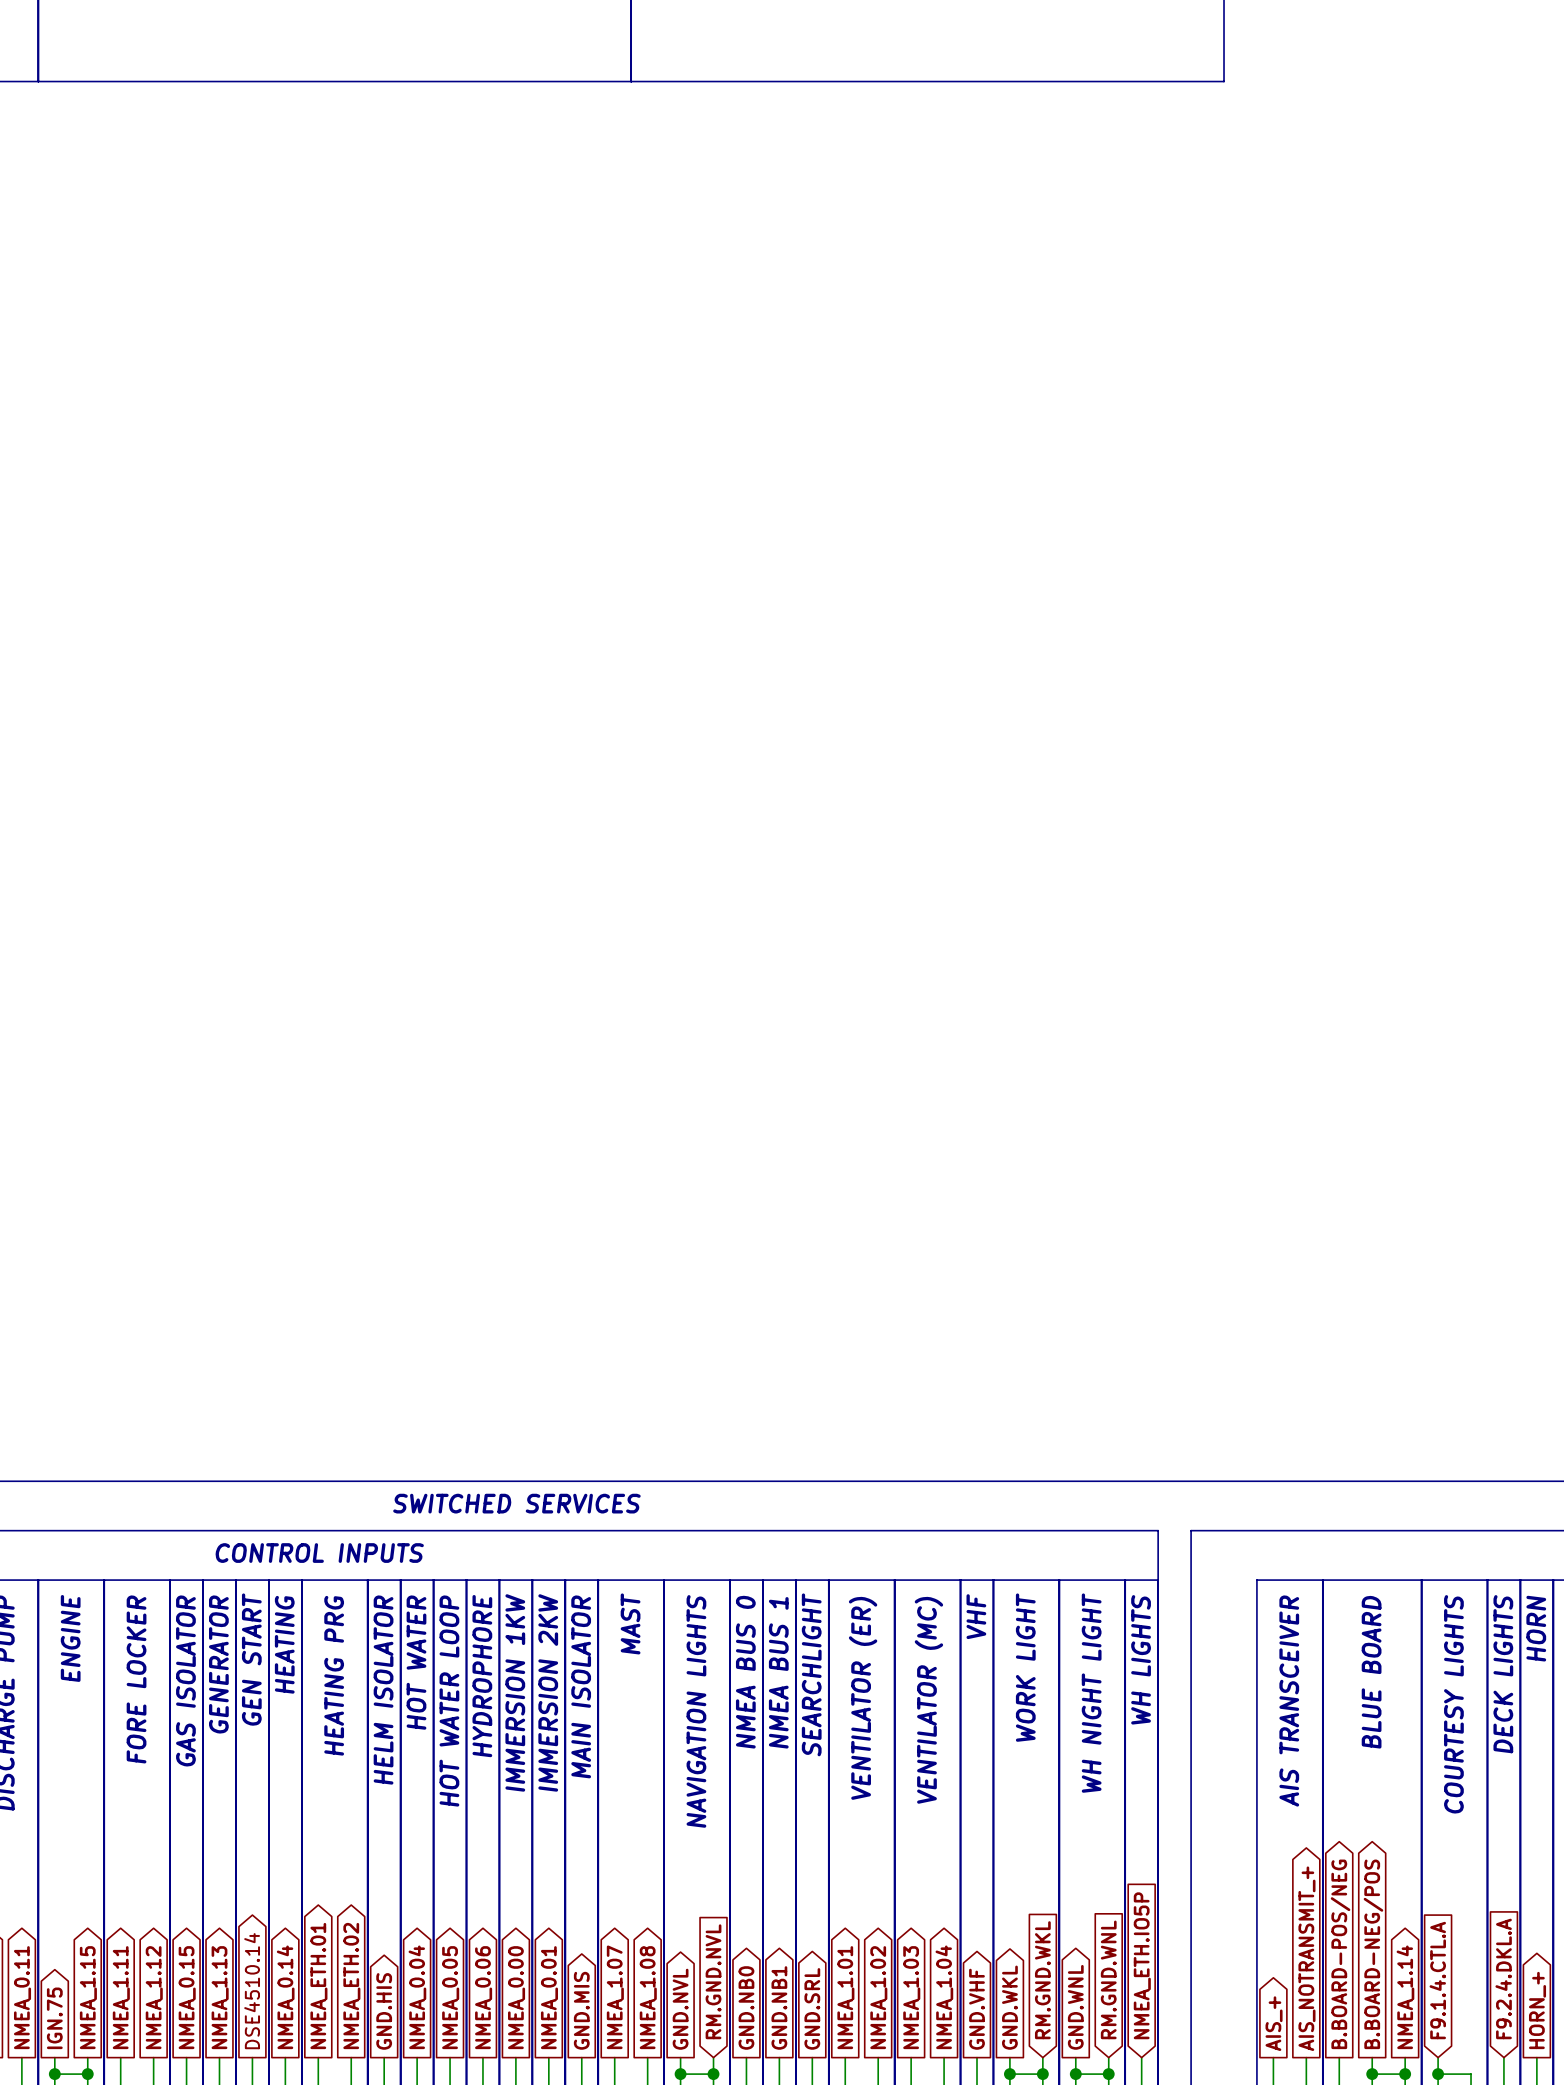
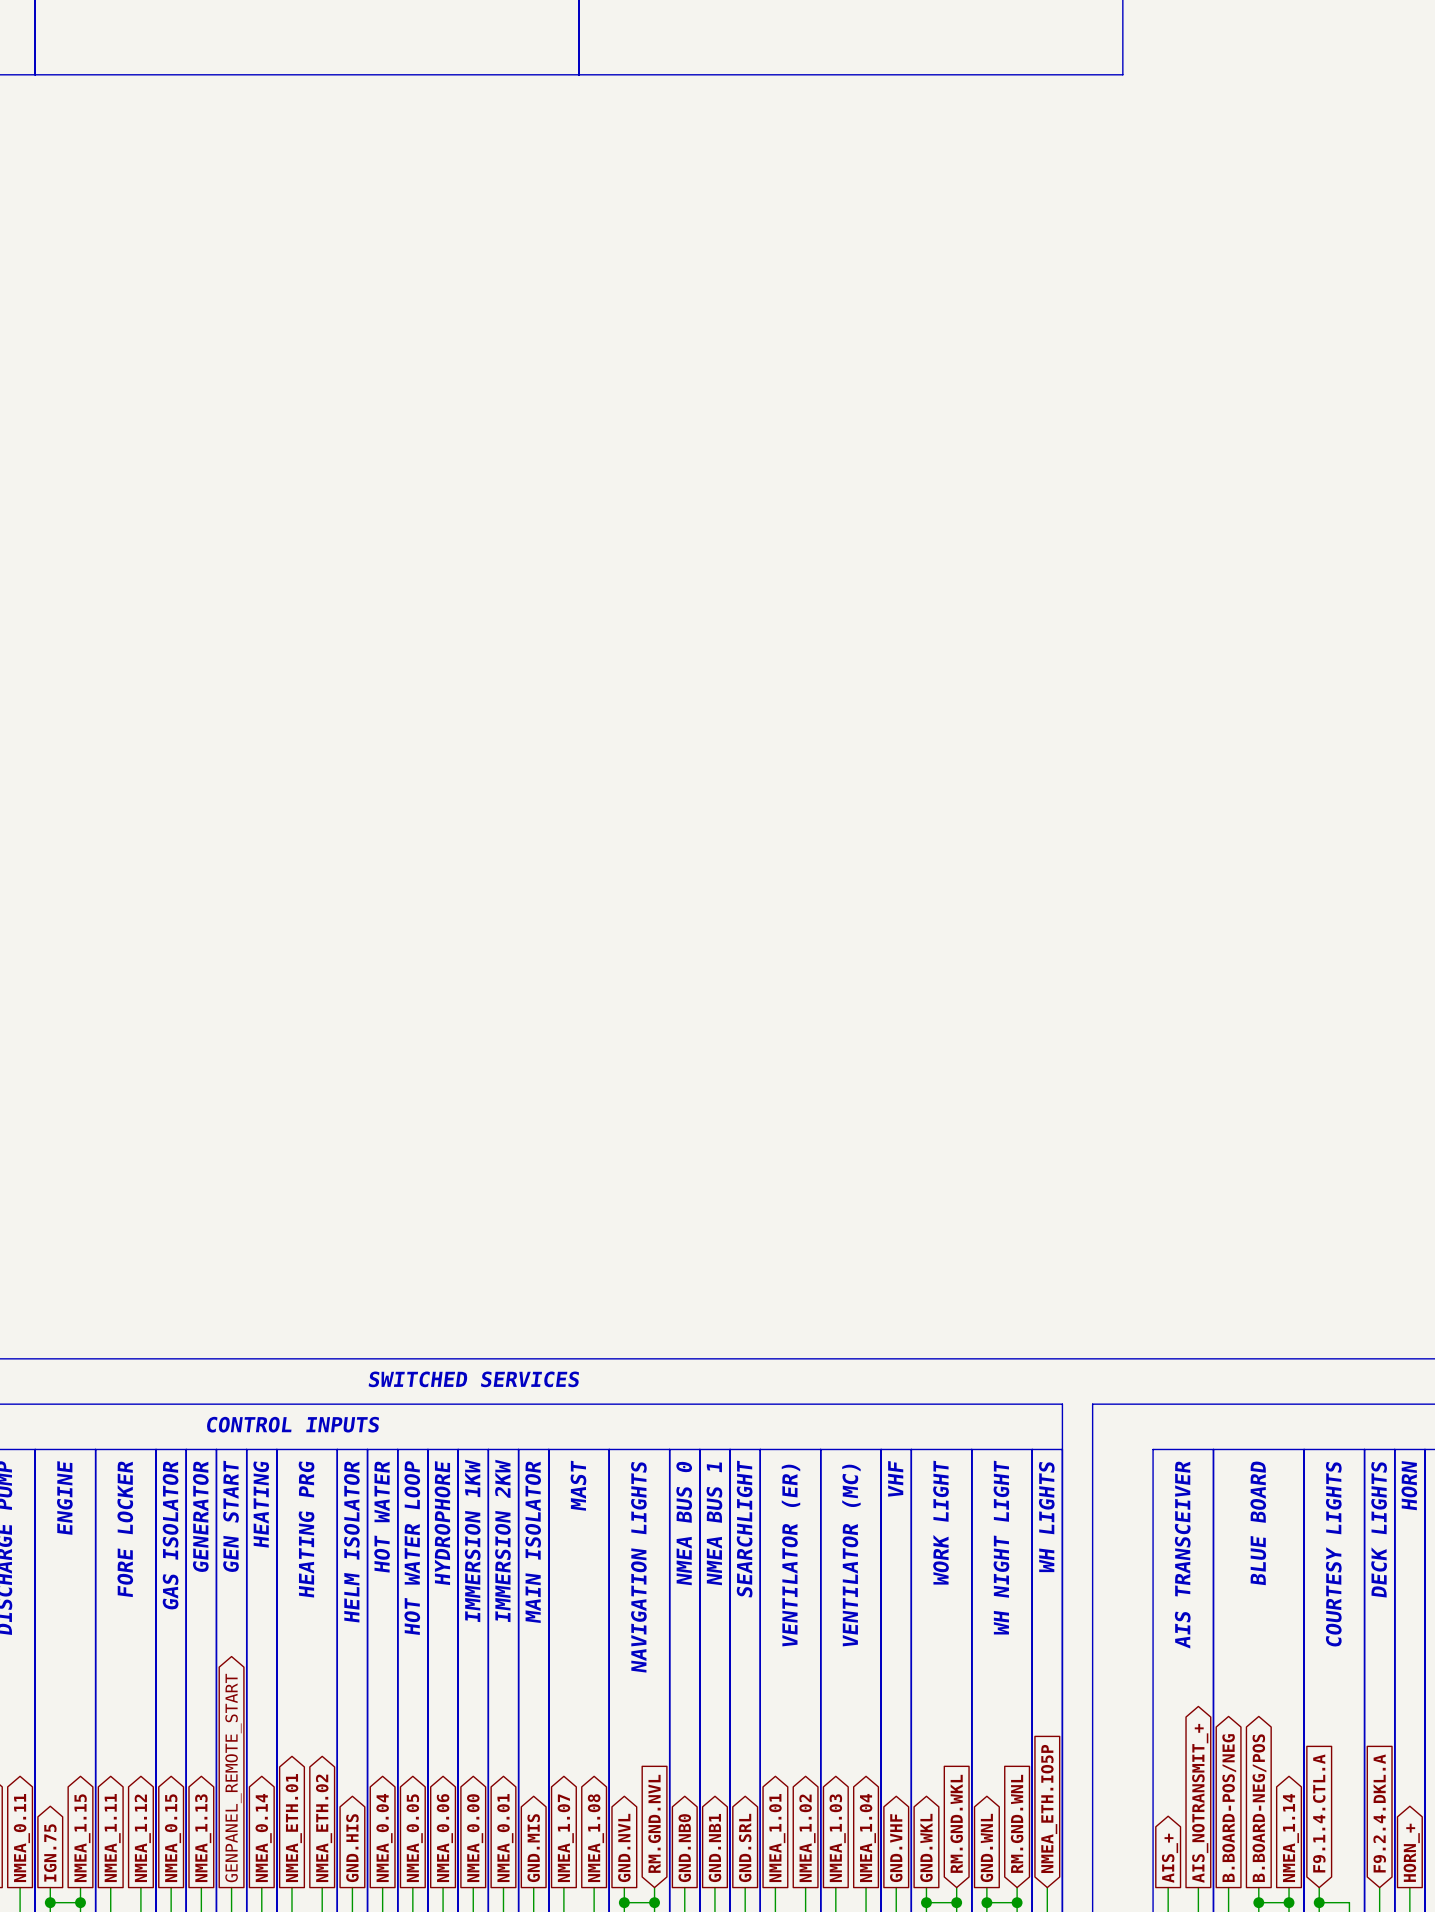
global label: DSE4510.14 (252, 1991) -> GENPANEL_REMOTE_START (233, 1778)

